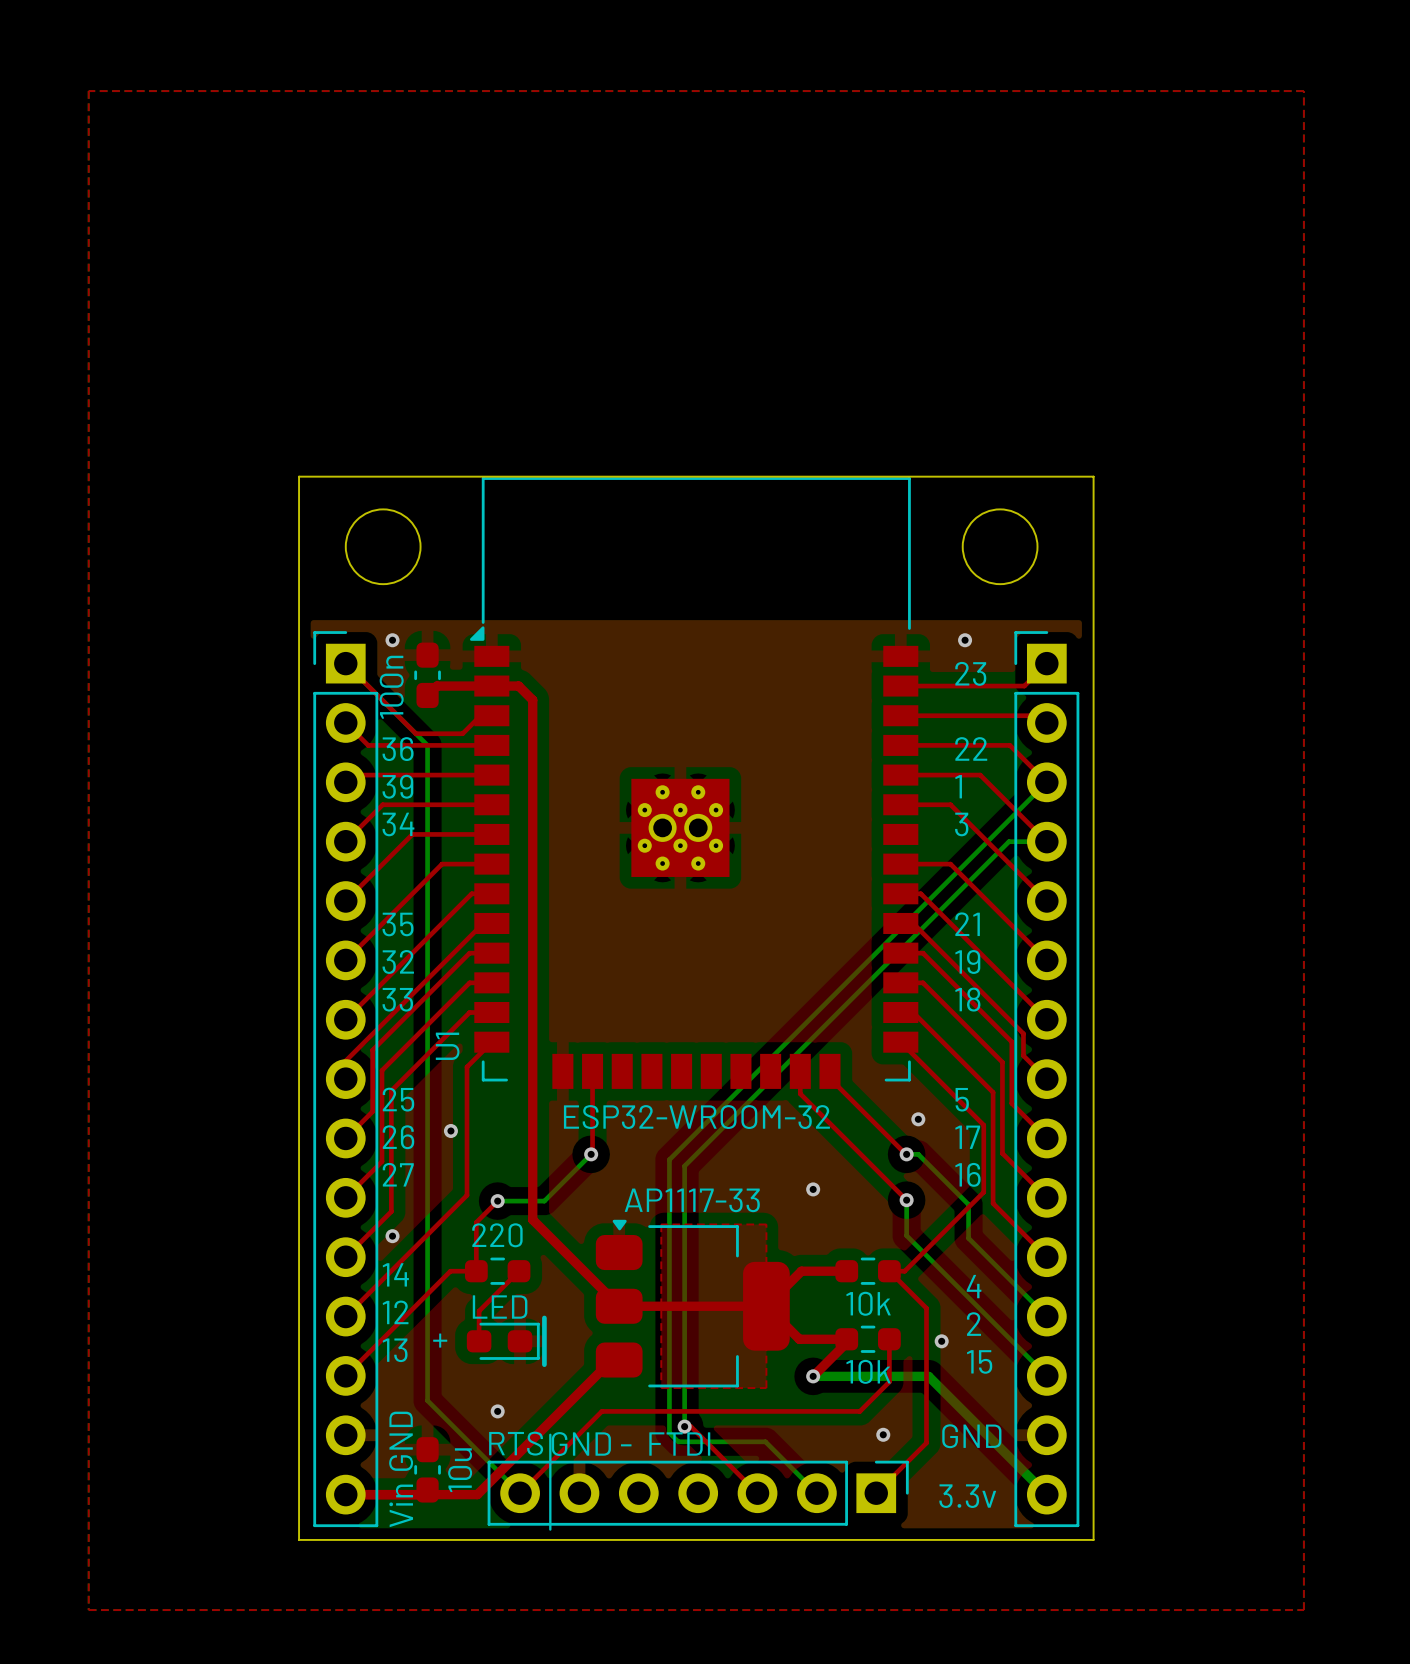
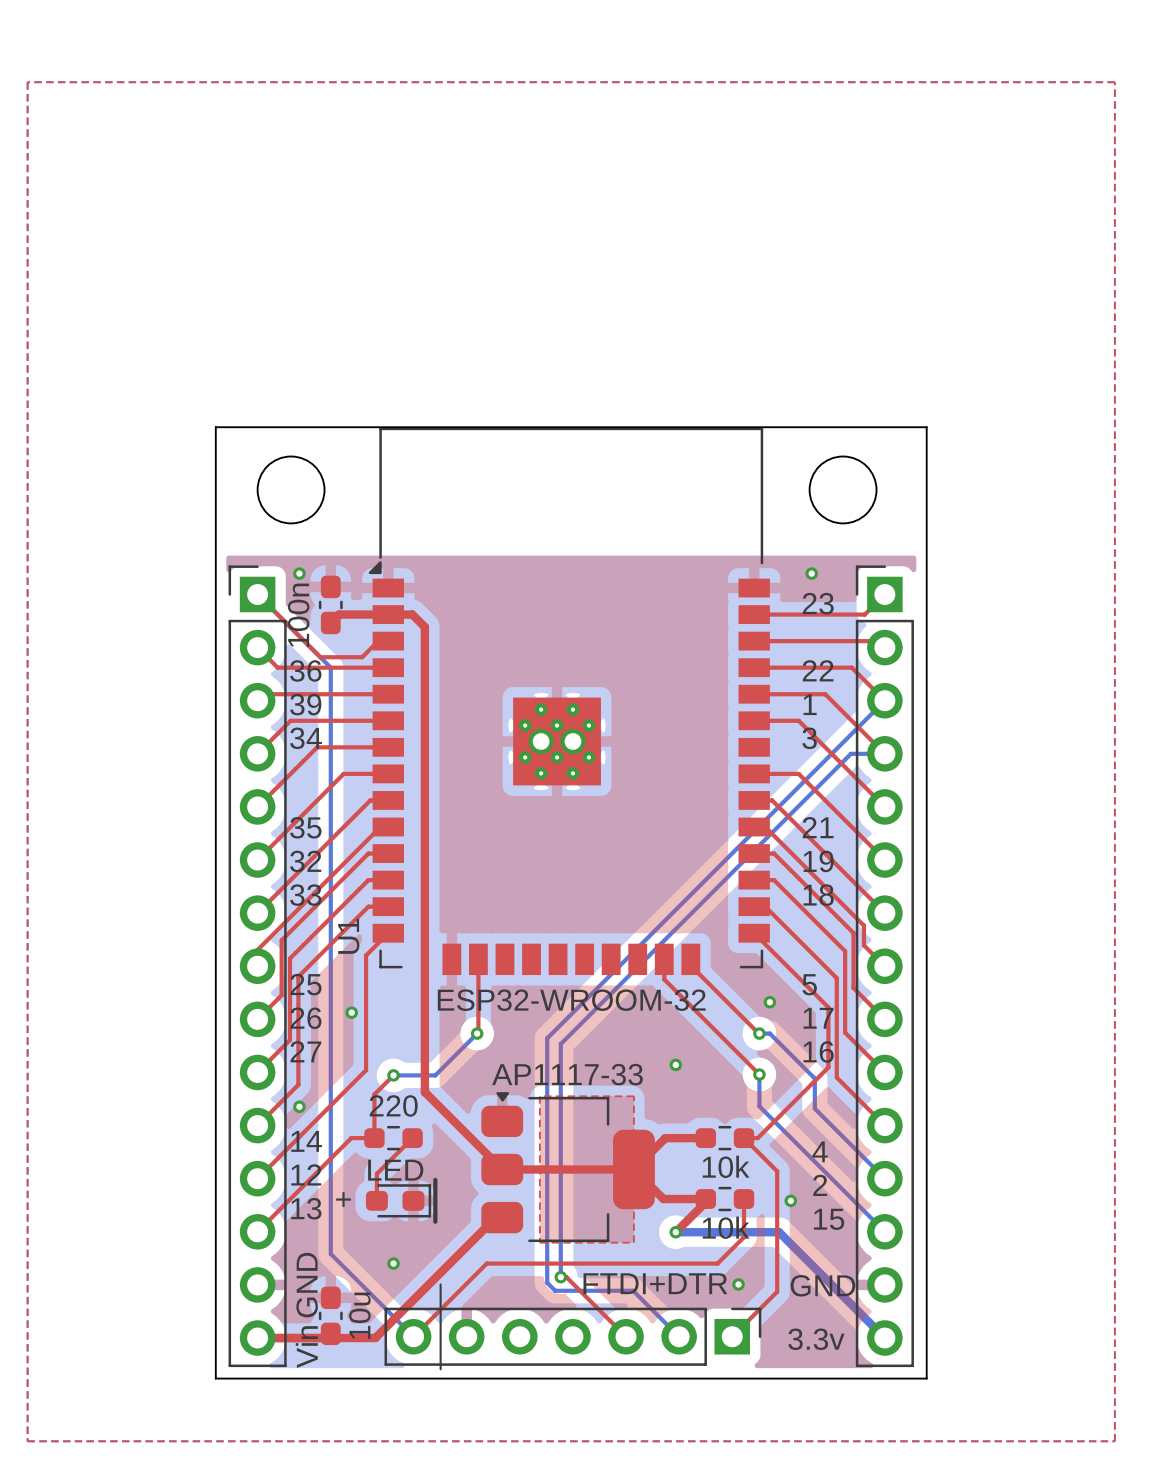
part value: none -> FTDI+DTR (655, 1283)
text: RTS (516, 1443) -> none
text: GND - FTDI (631, 1444) -> none

